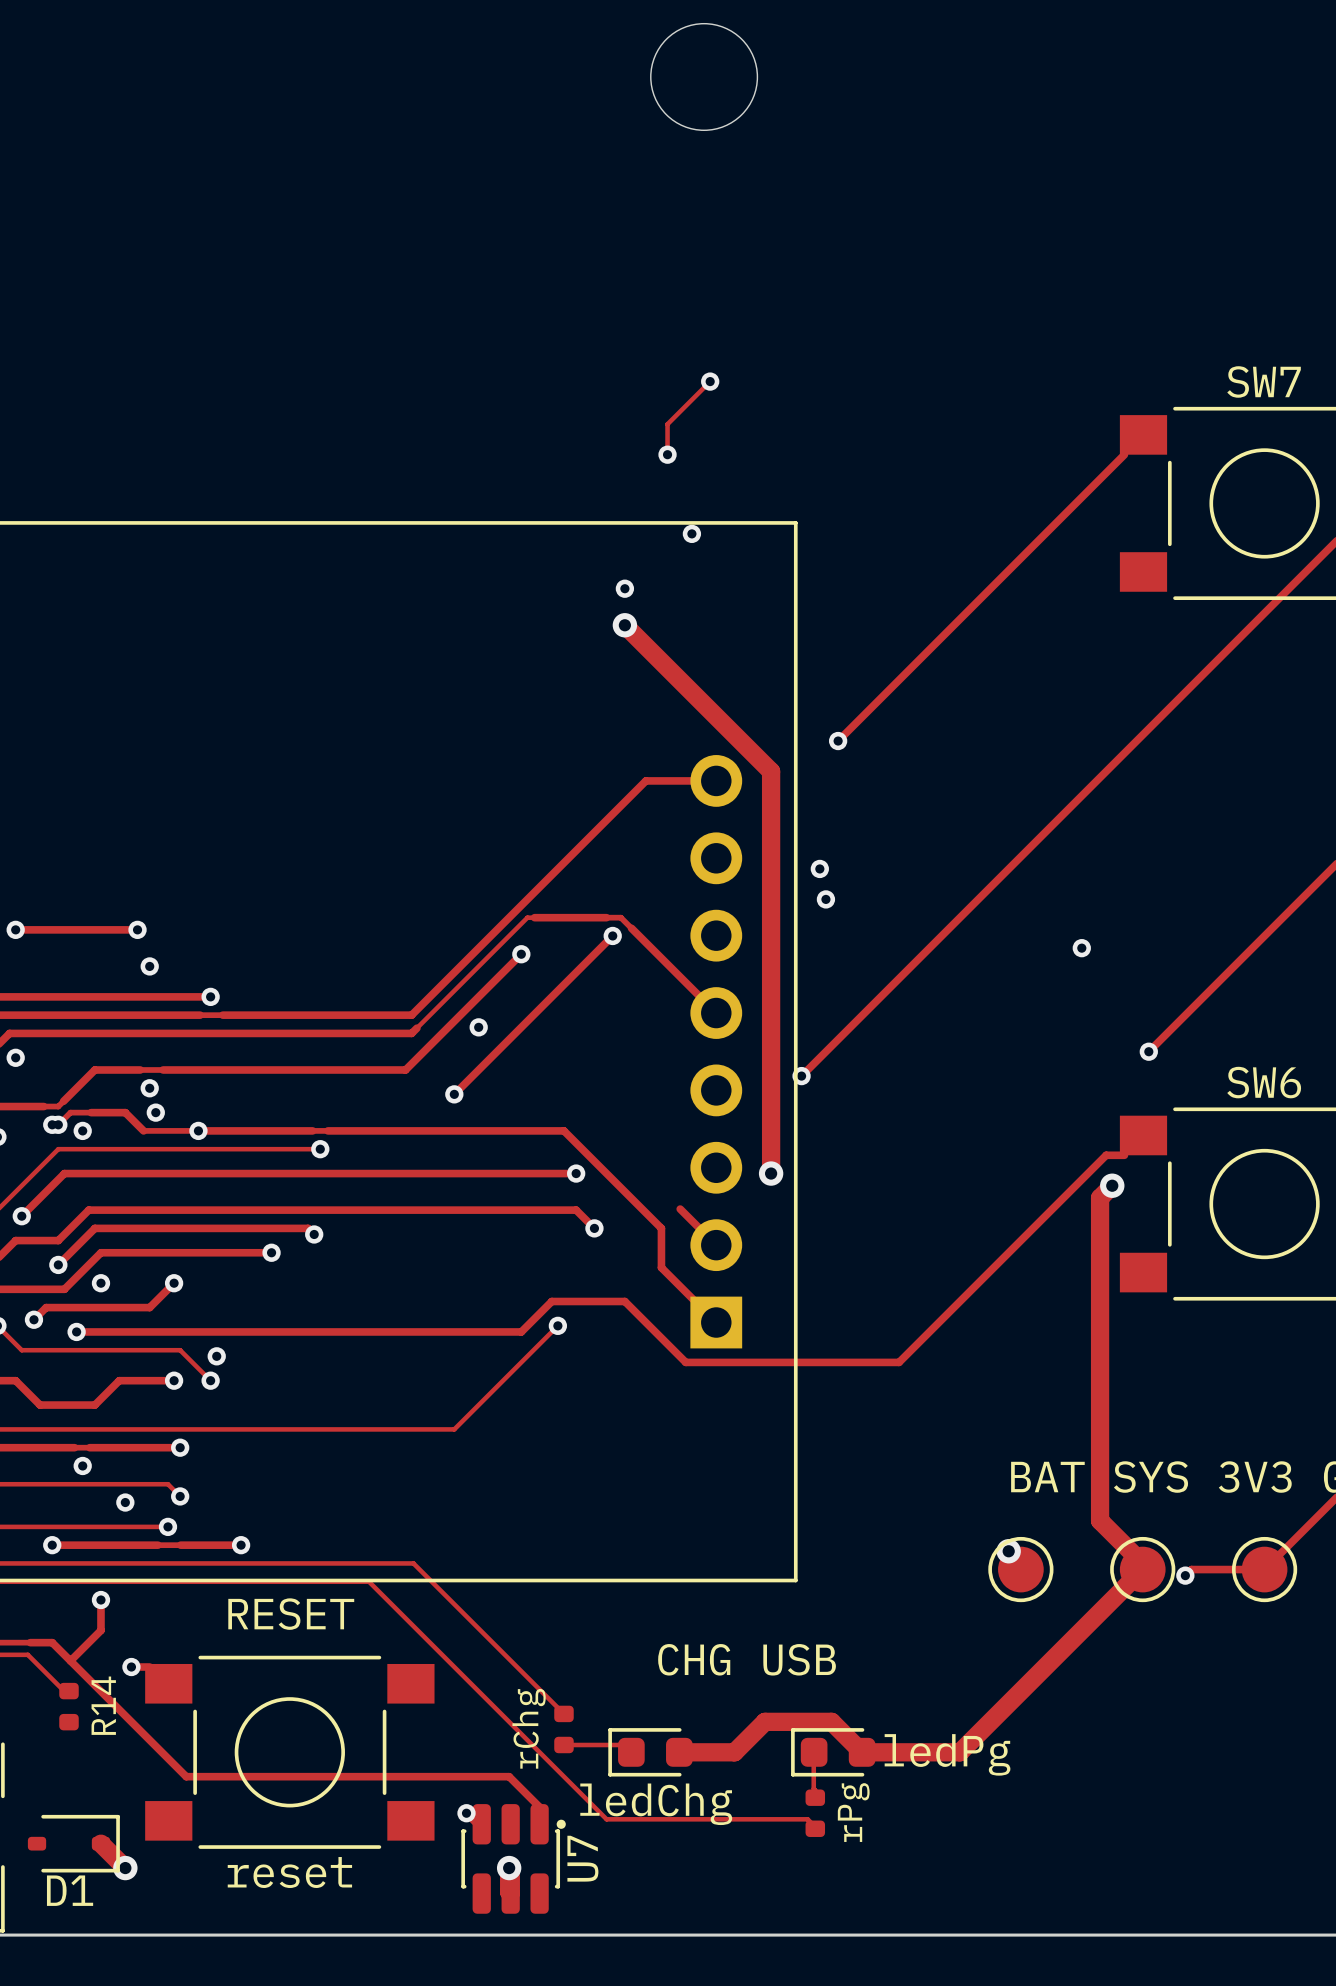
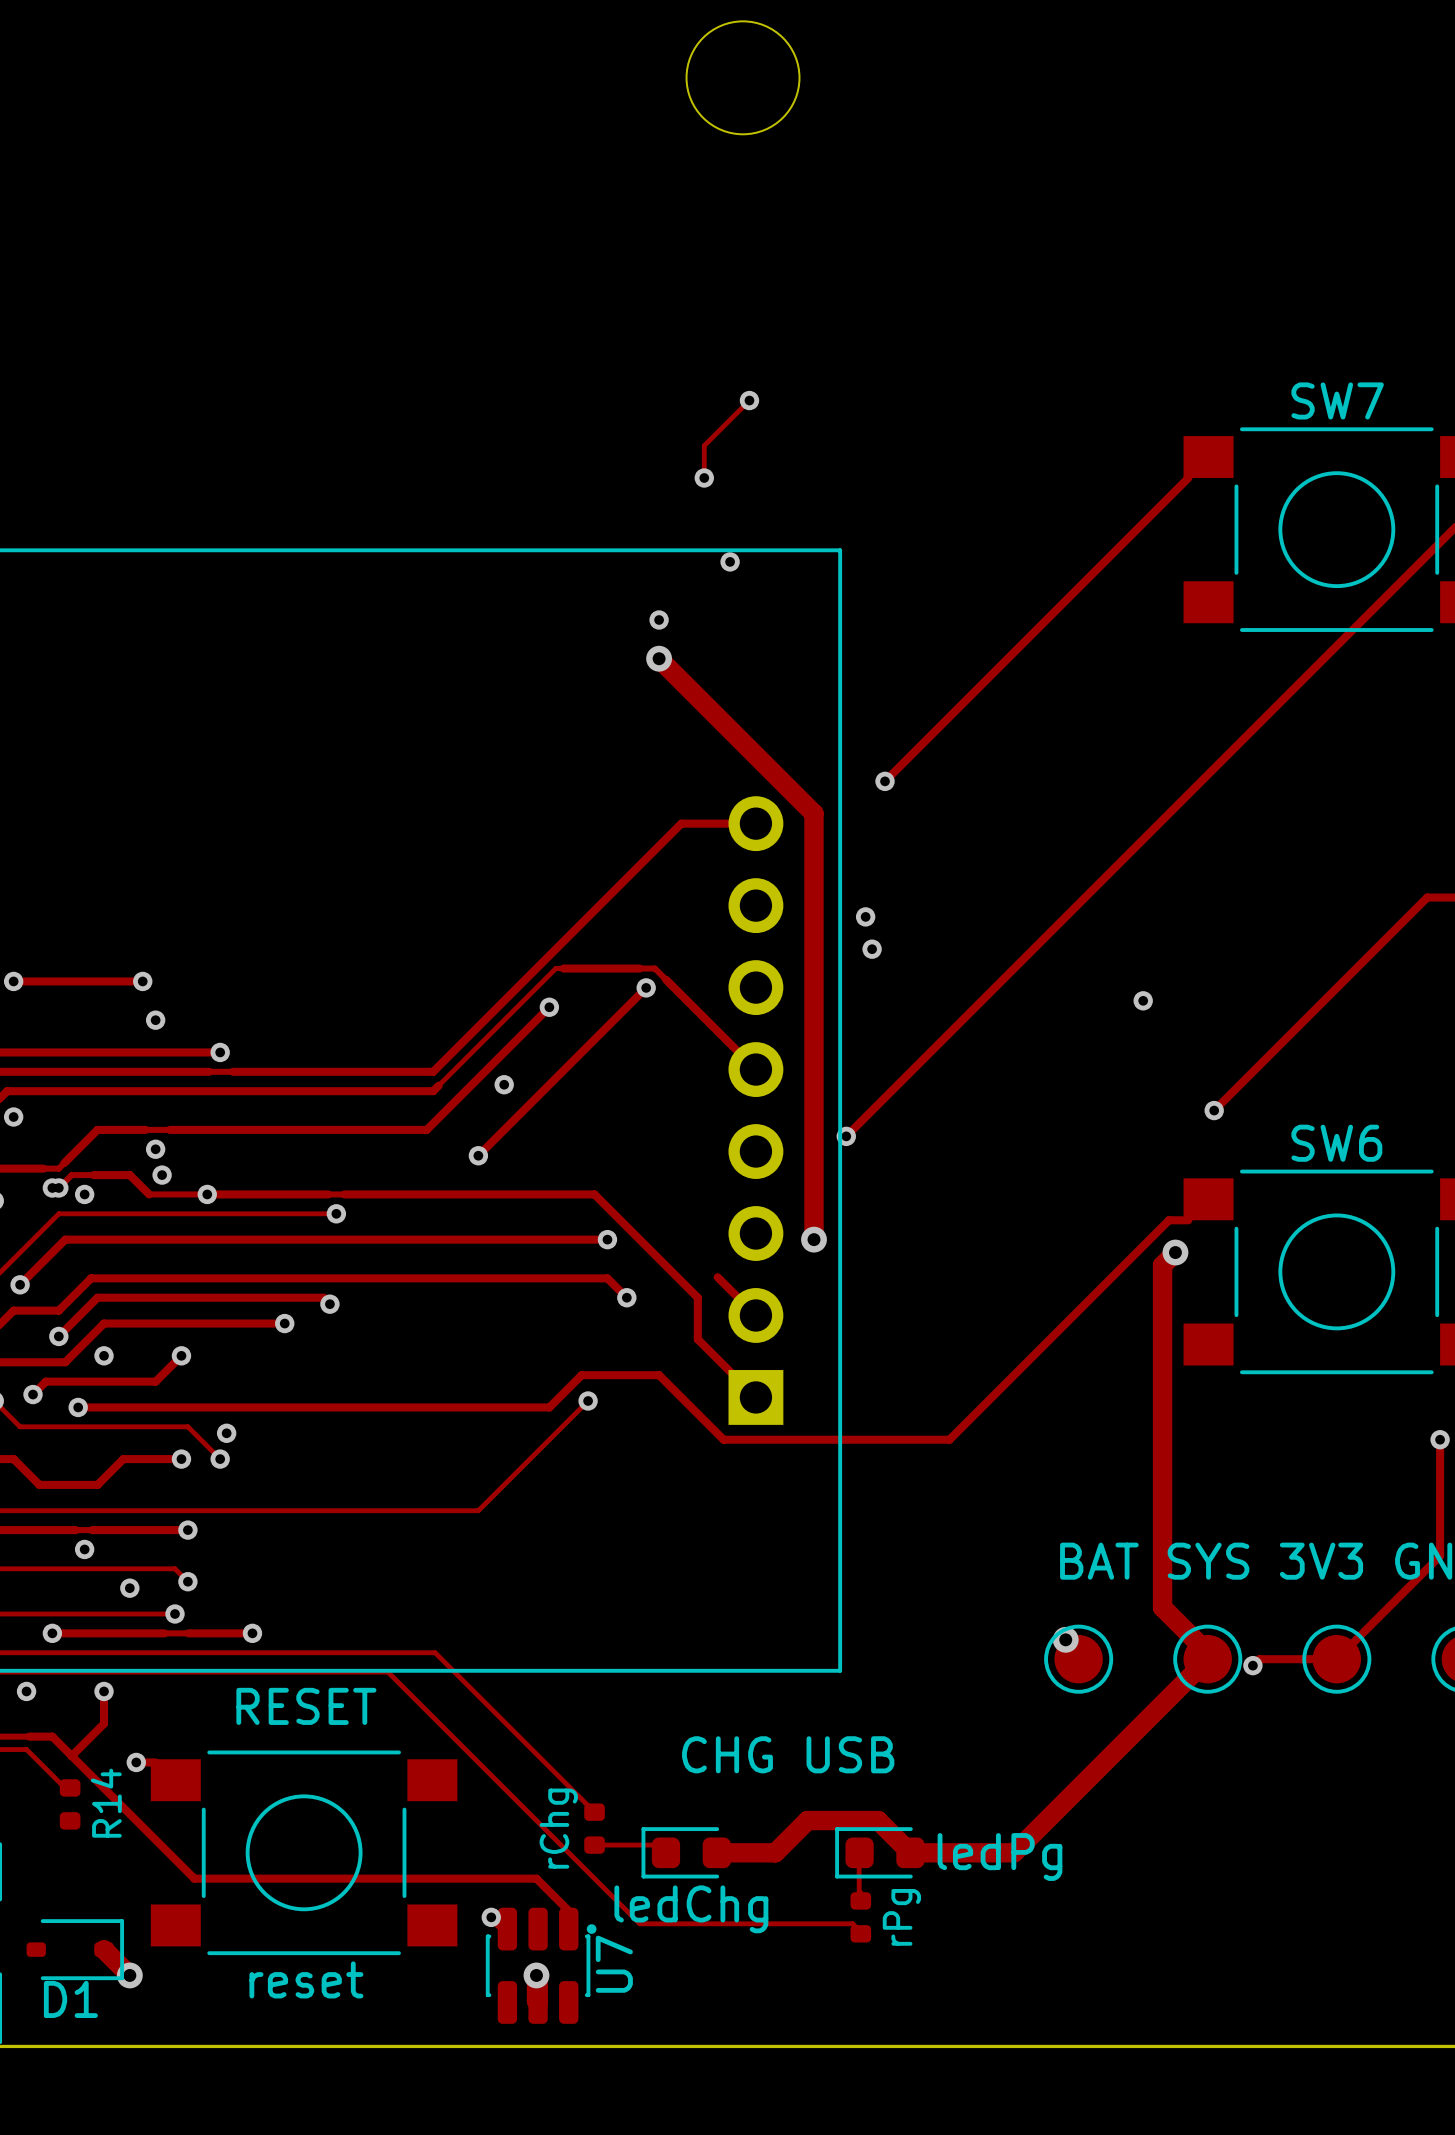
via: none -> (26, 1691)

